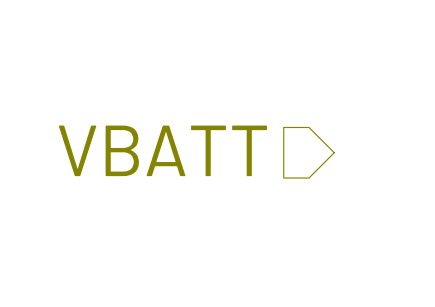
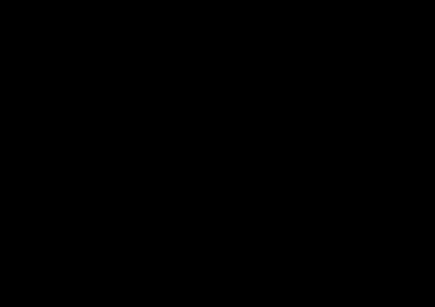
hierarchical label: VBATT (162, 150) -> none

